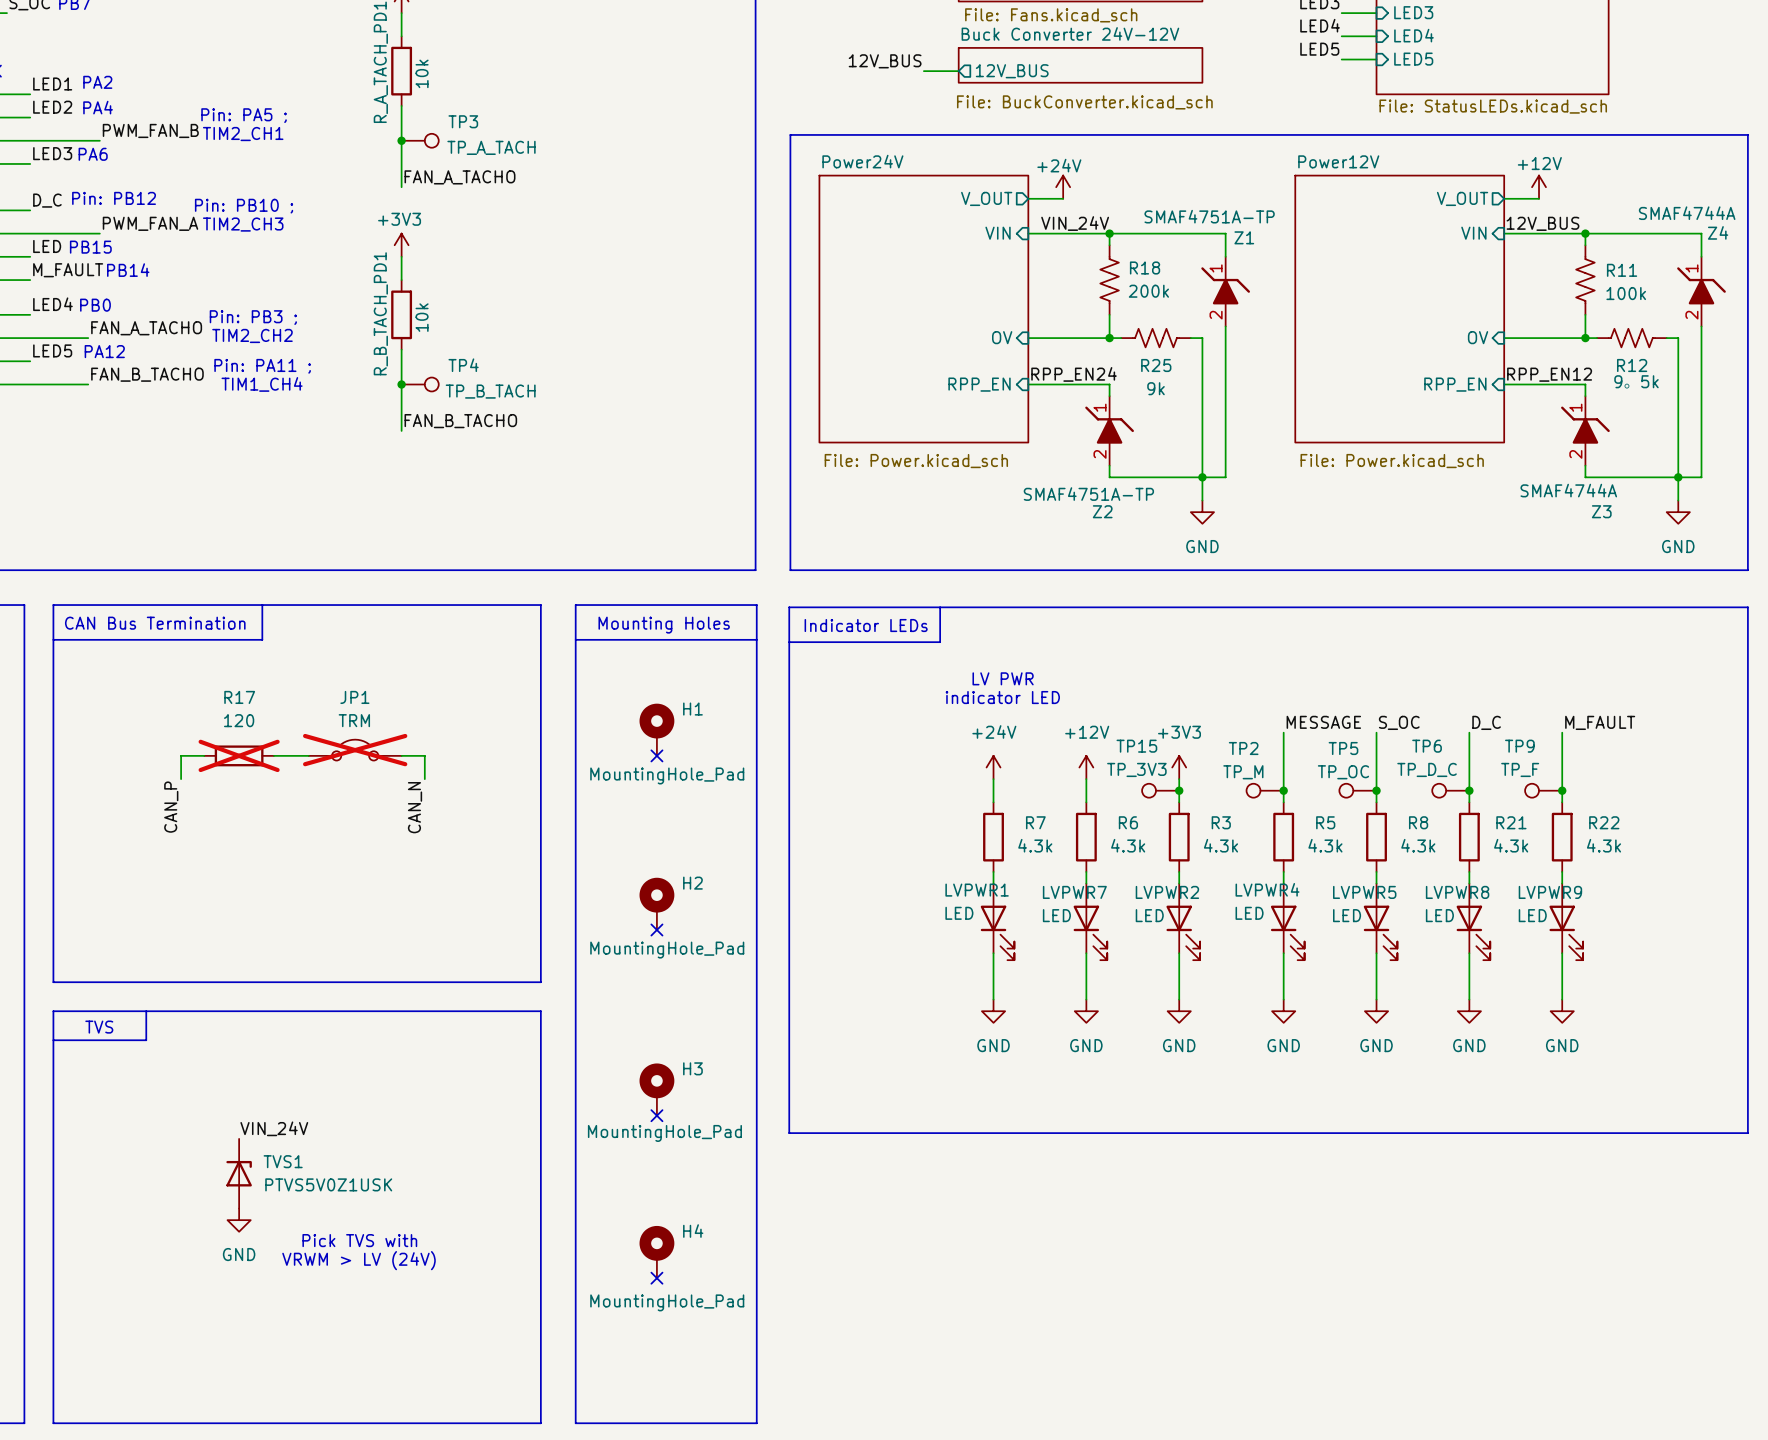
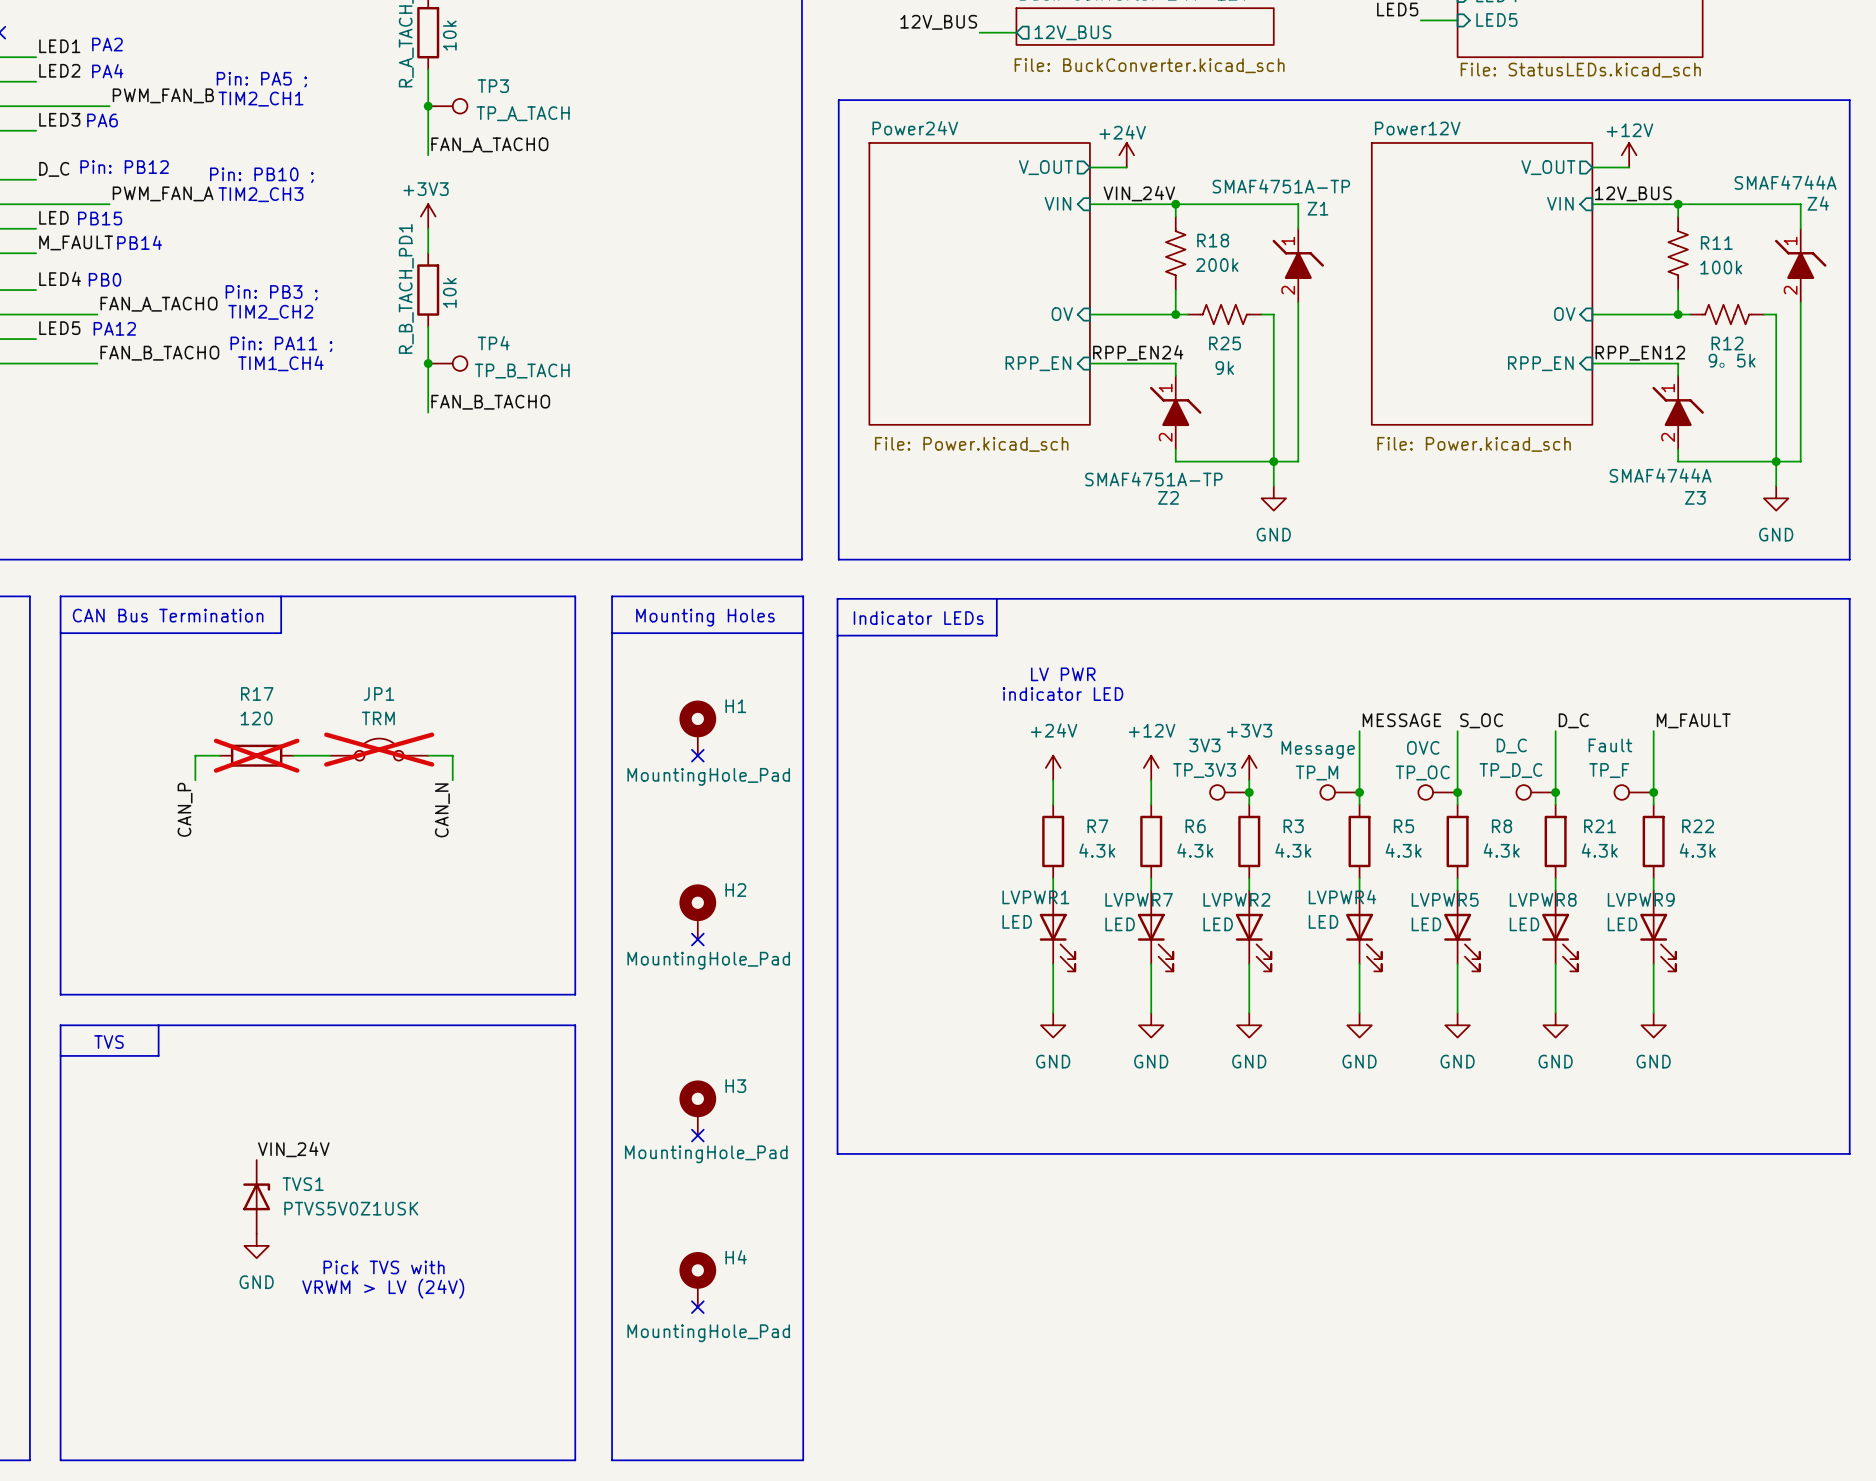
TP15 name: TP15 (1136, 746) -> 3V3 (1204, 745)
TP6 name: TP6 (1427, 746) -> D_C (1511, 746)
TP9 name: TP9 (1519, 746) -> Fault (1610, 745)
TP2 name: TP2 (1243, 748) -> Message (1318, 749)
TP5 name: TP5 (1343, 748) -> OVC (1423, 747)

